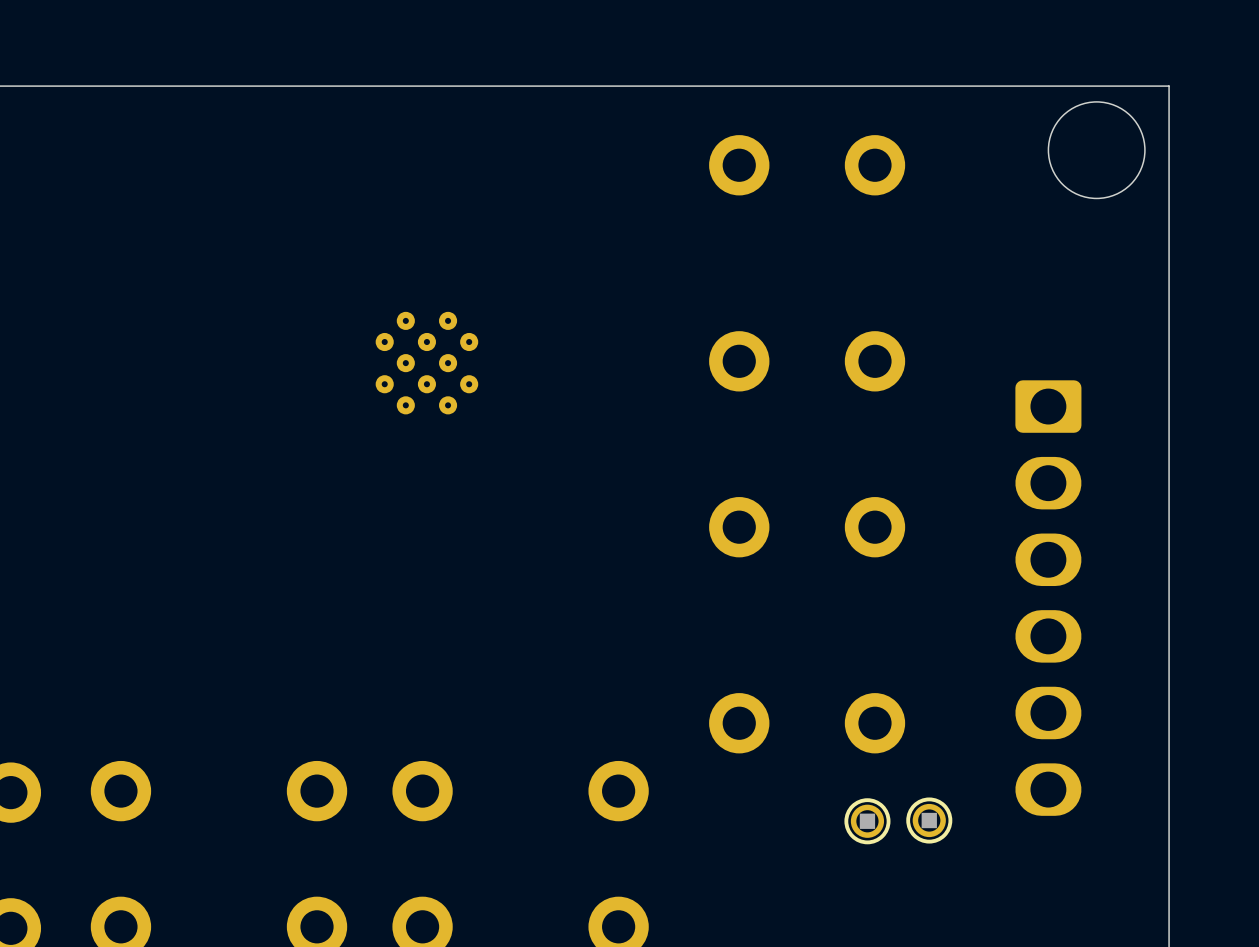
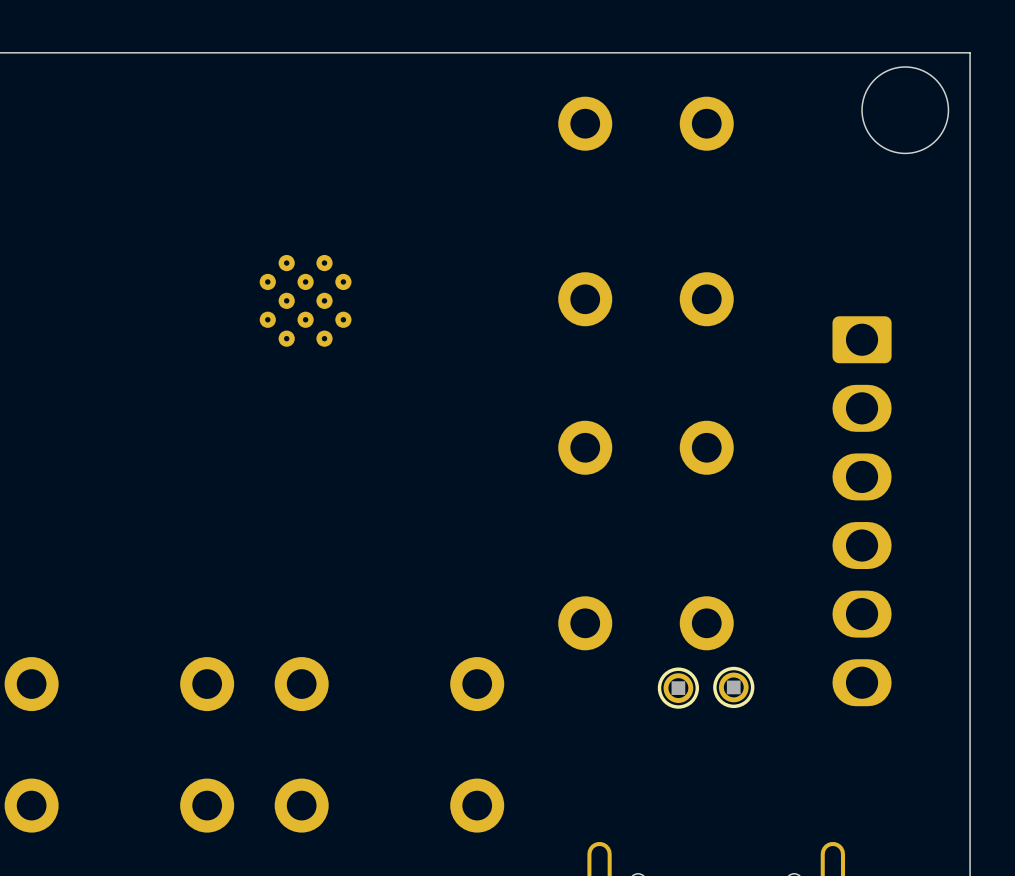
part: none -> (733, 687)
part: none -> (678, 688)
part: (929, 820) -> none
part: (867, 821) -> none

